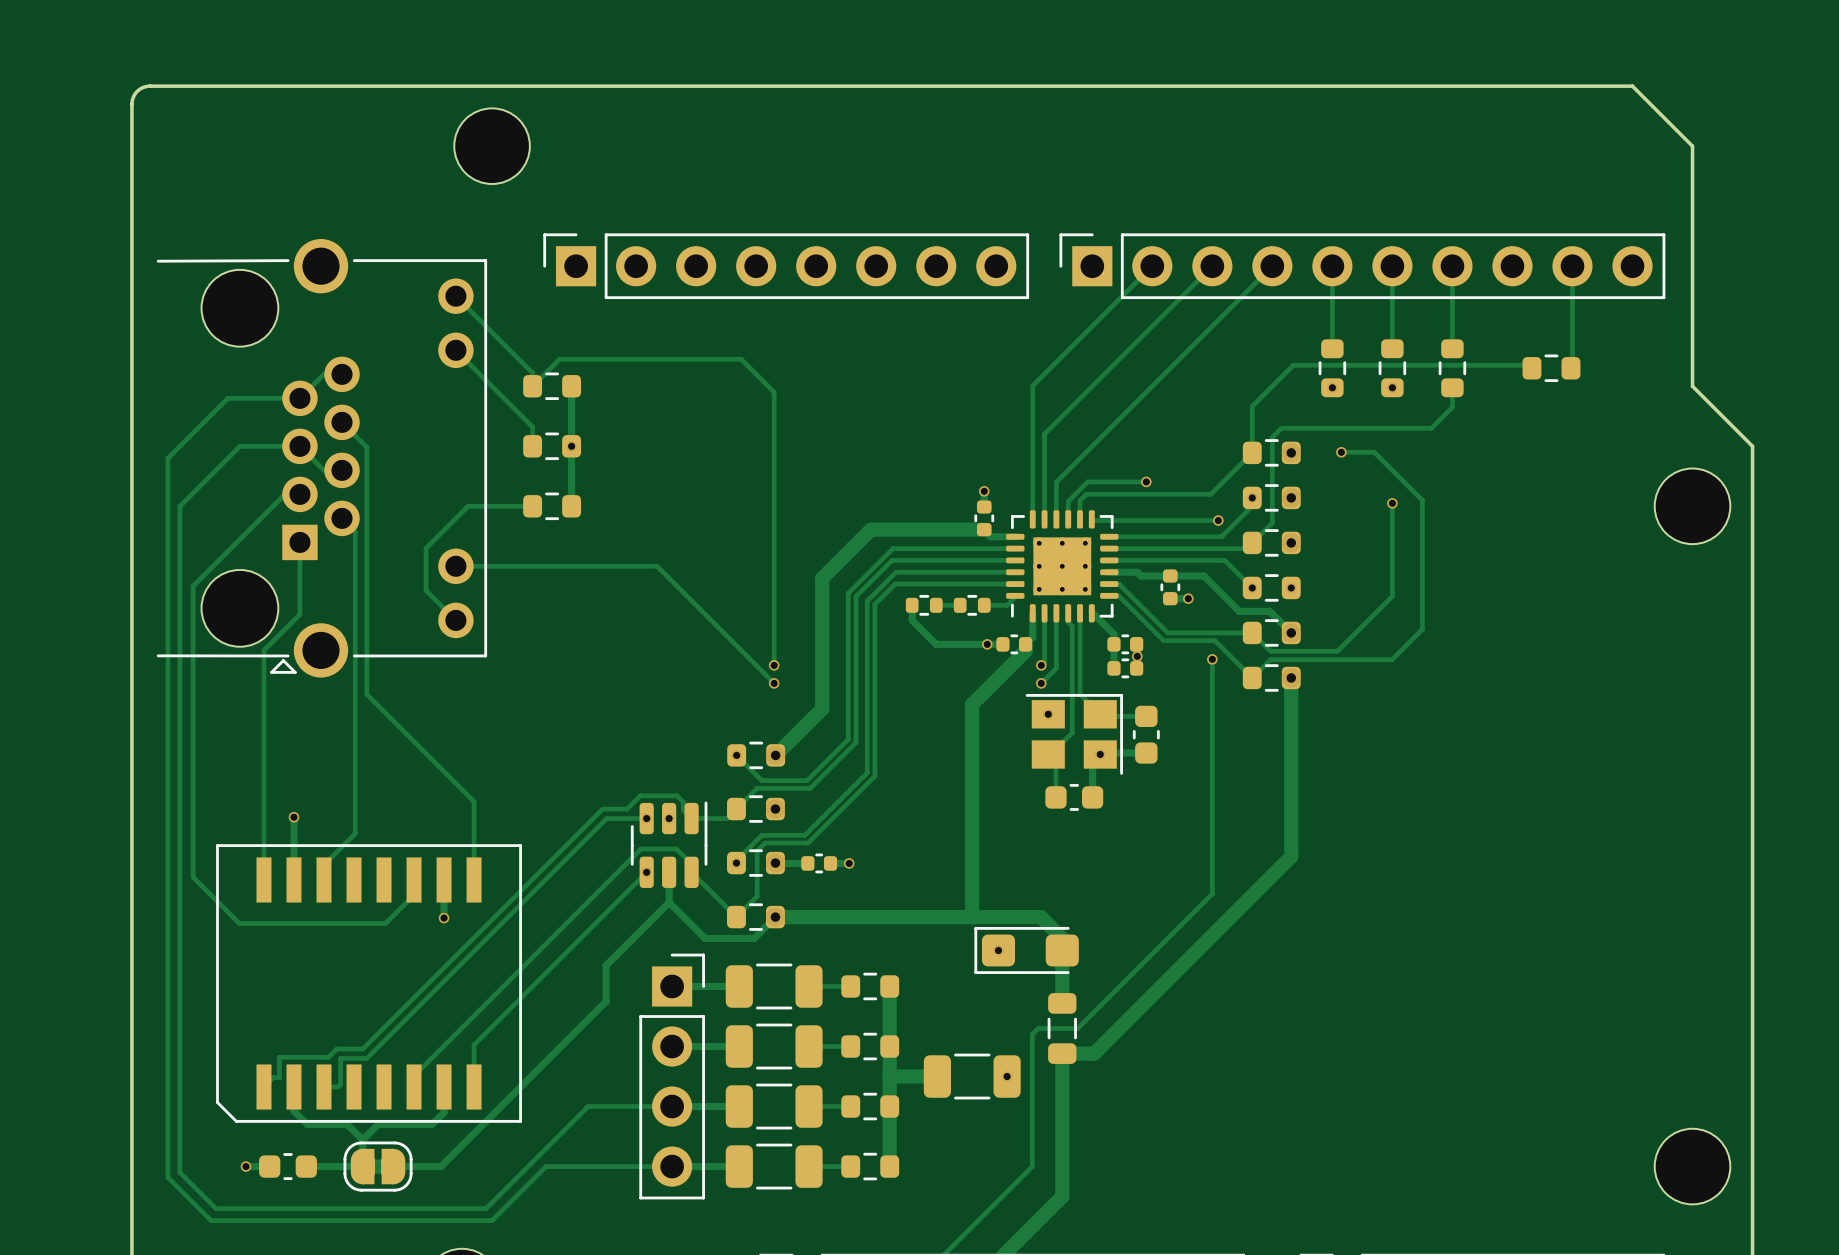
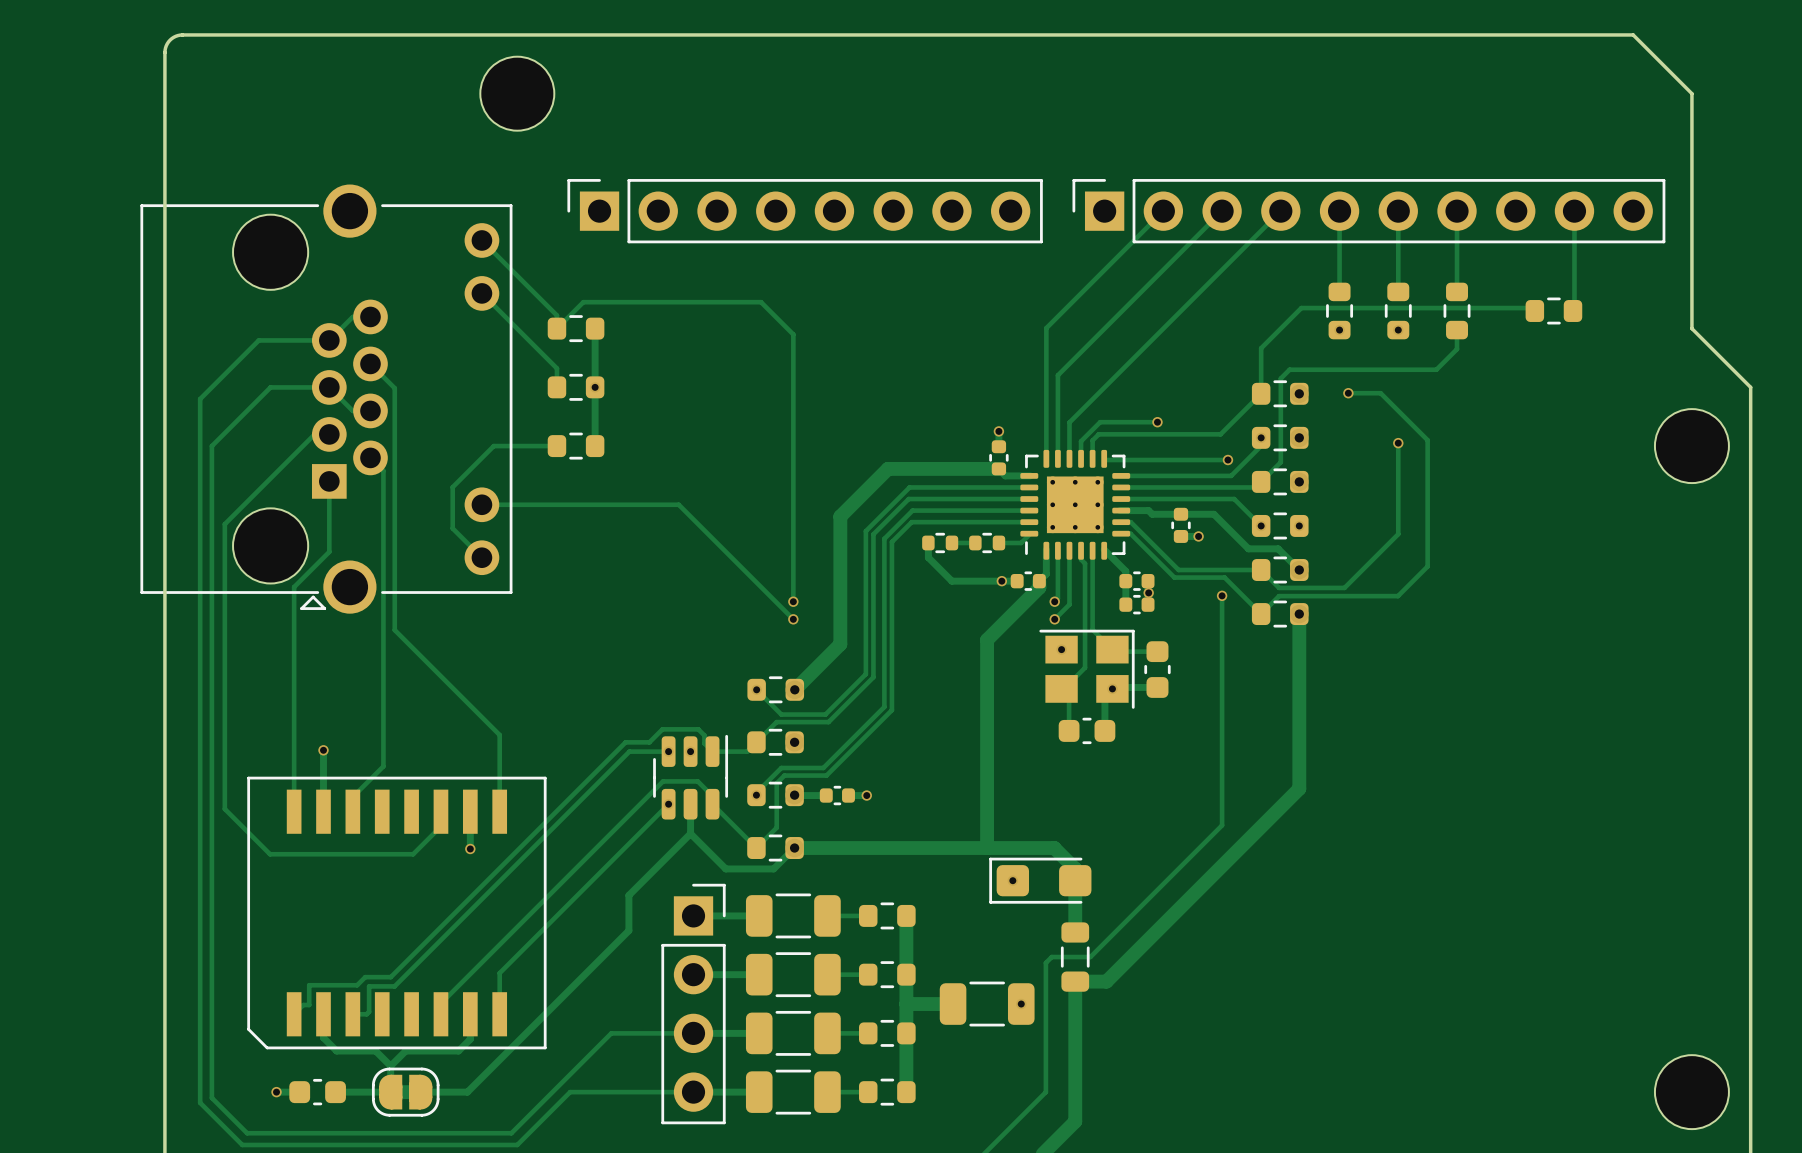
part: none -> (326, 399)
part: (321, 458) -> none

